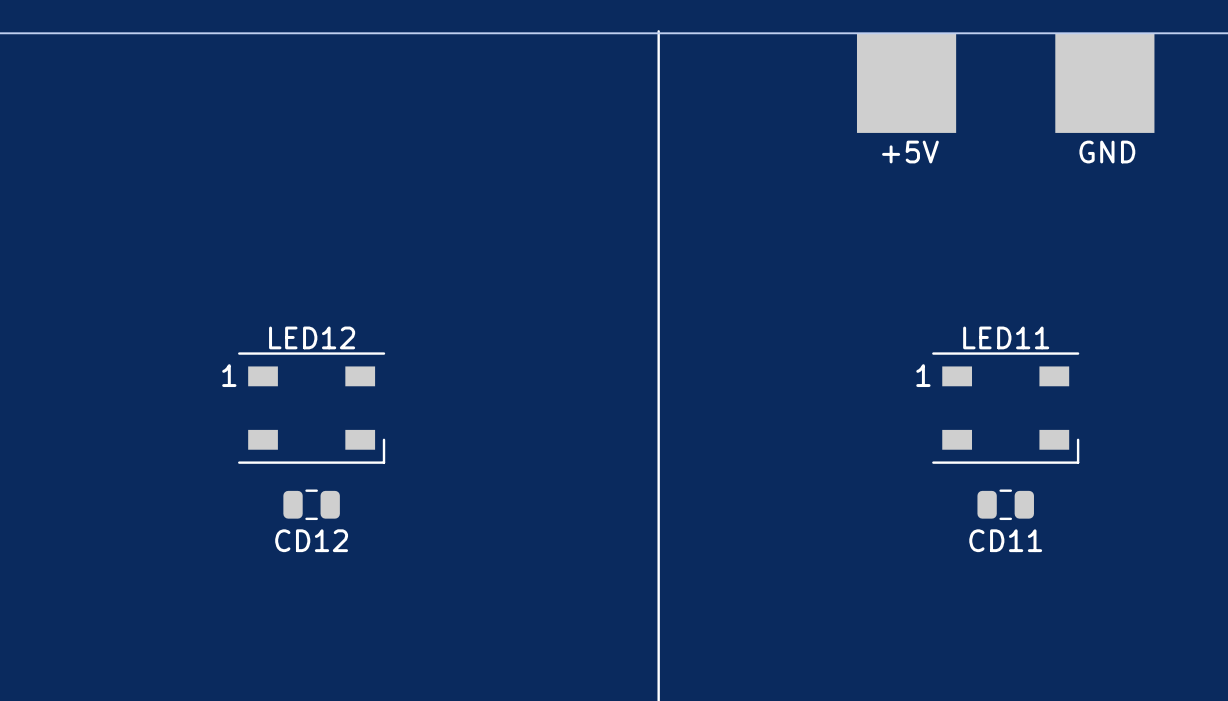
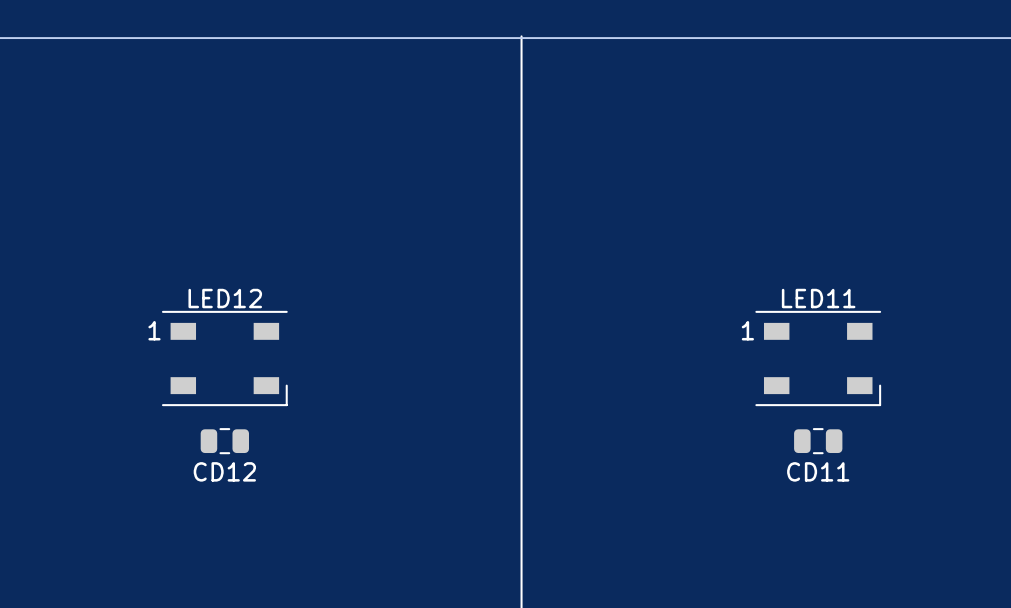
part: +5V (906, 83) -> none
part: GND (1104, 83) -> none

